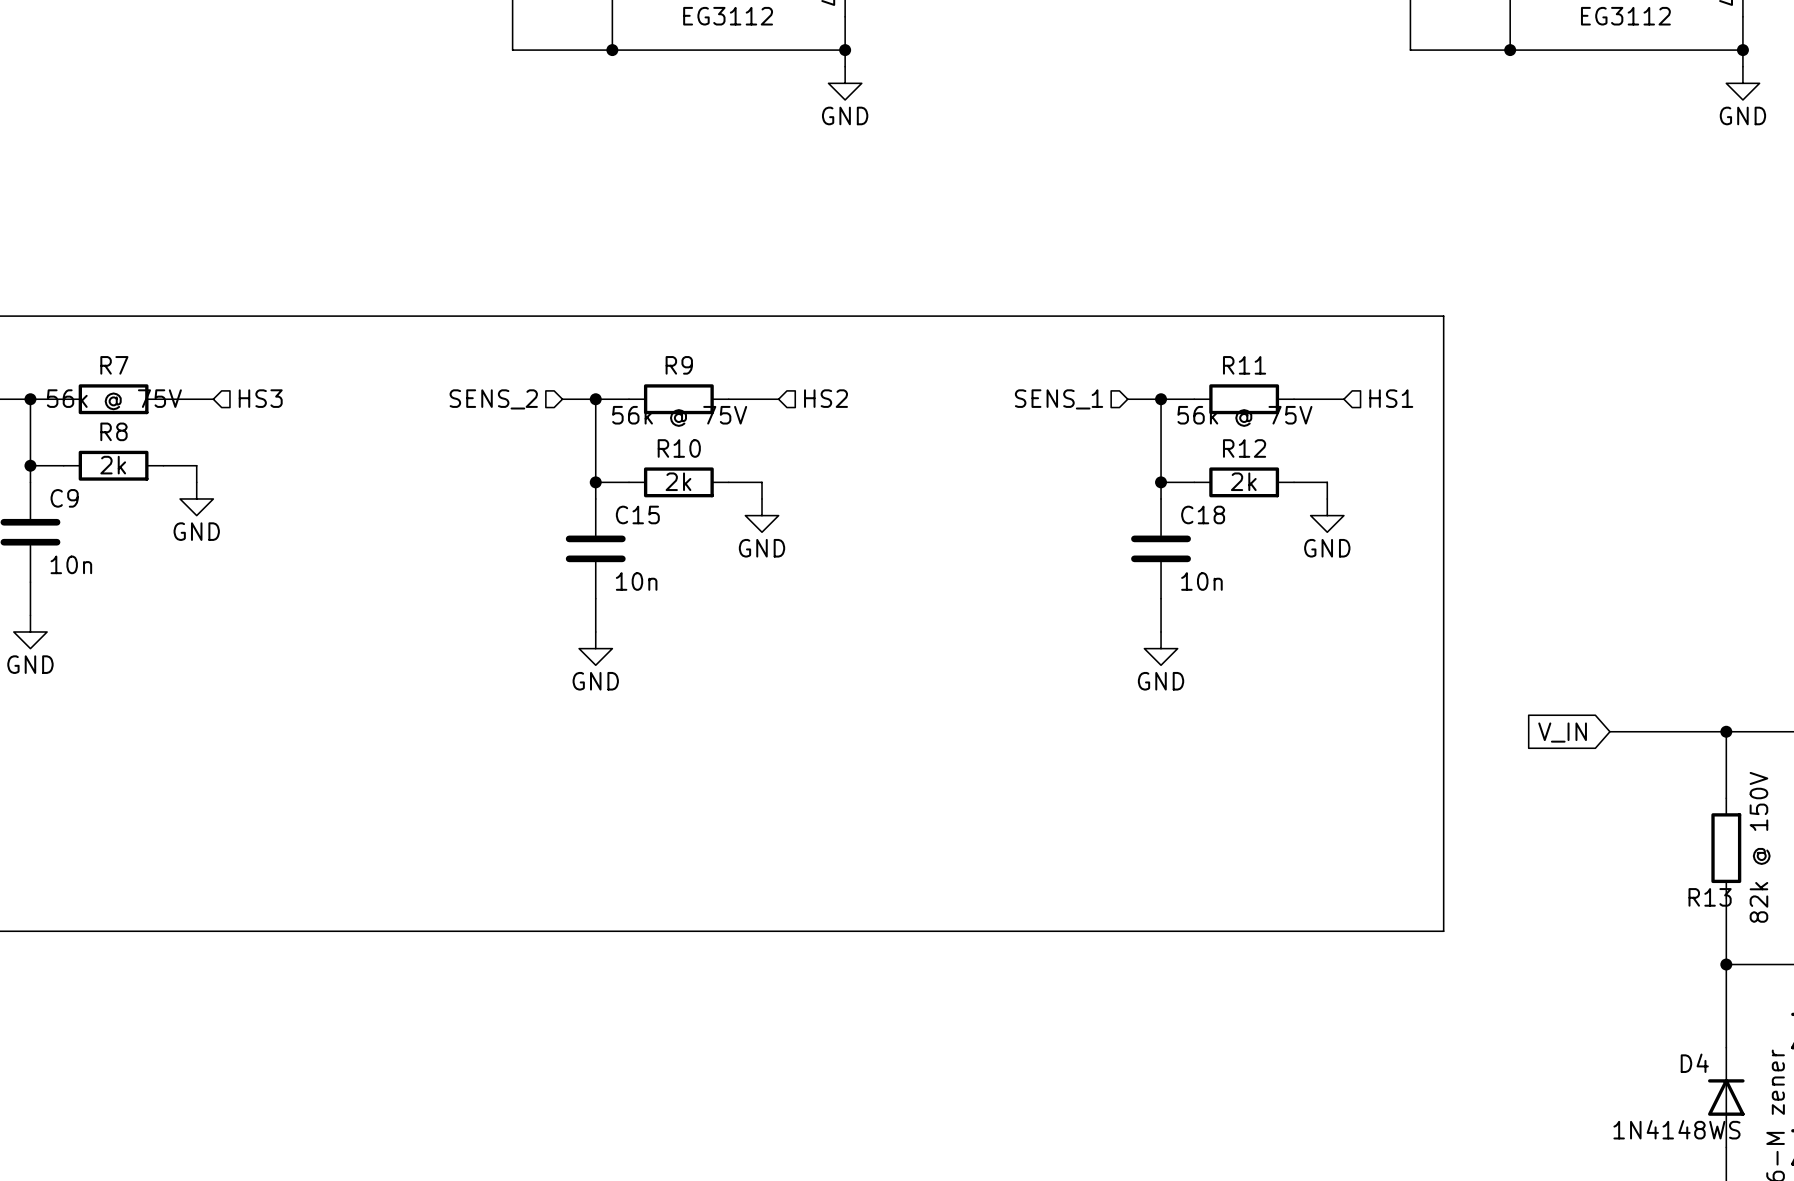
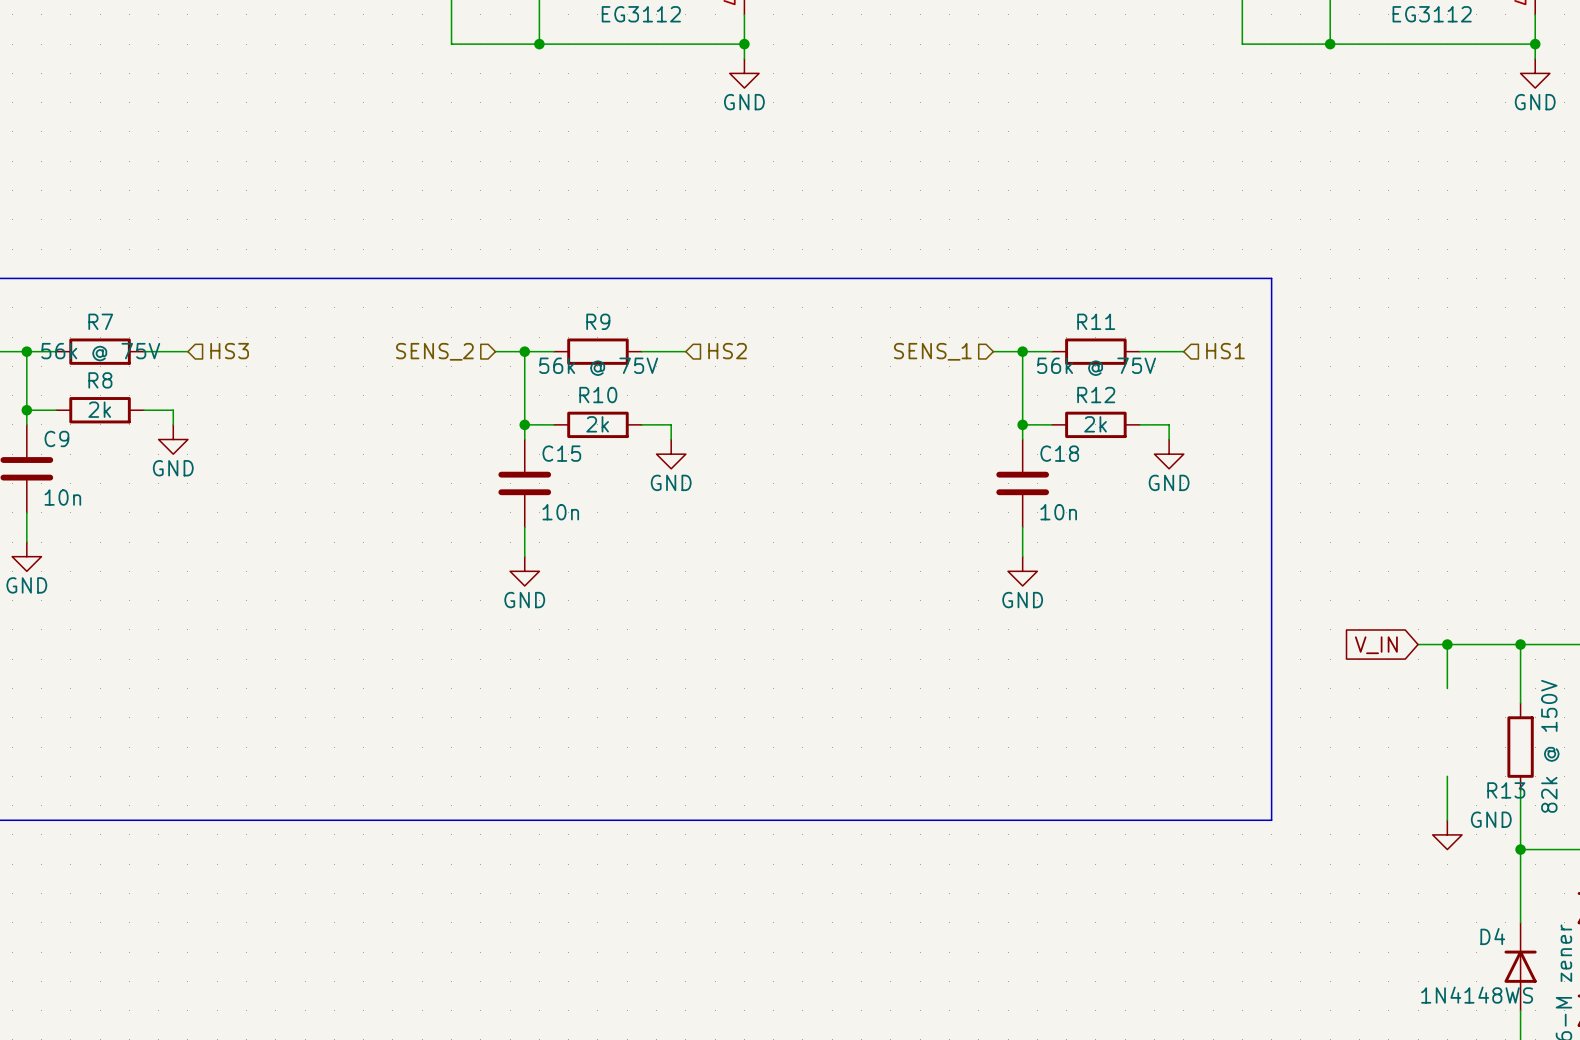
wire: none -> (1447, 644) (1447, 688)
junction: none -> (1447, 644)
wire: none -> (1447, 776) (1447, 820)
power symbol: none -> GND (1447, 834)

